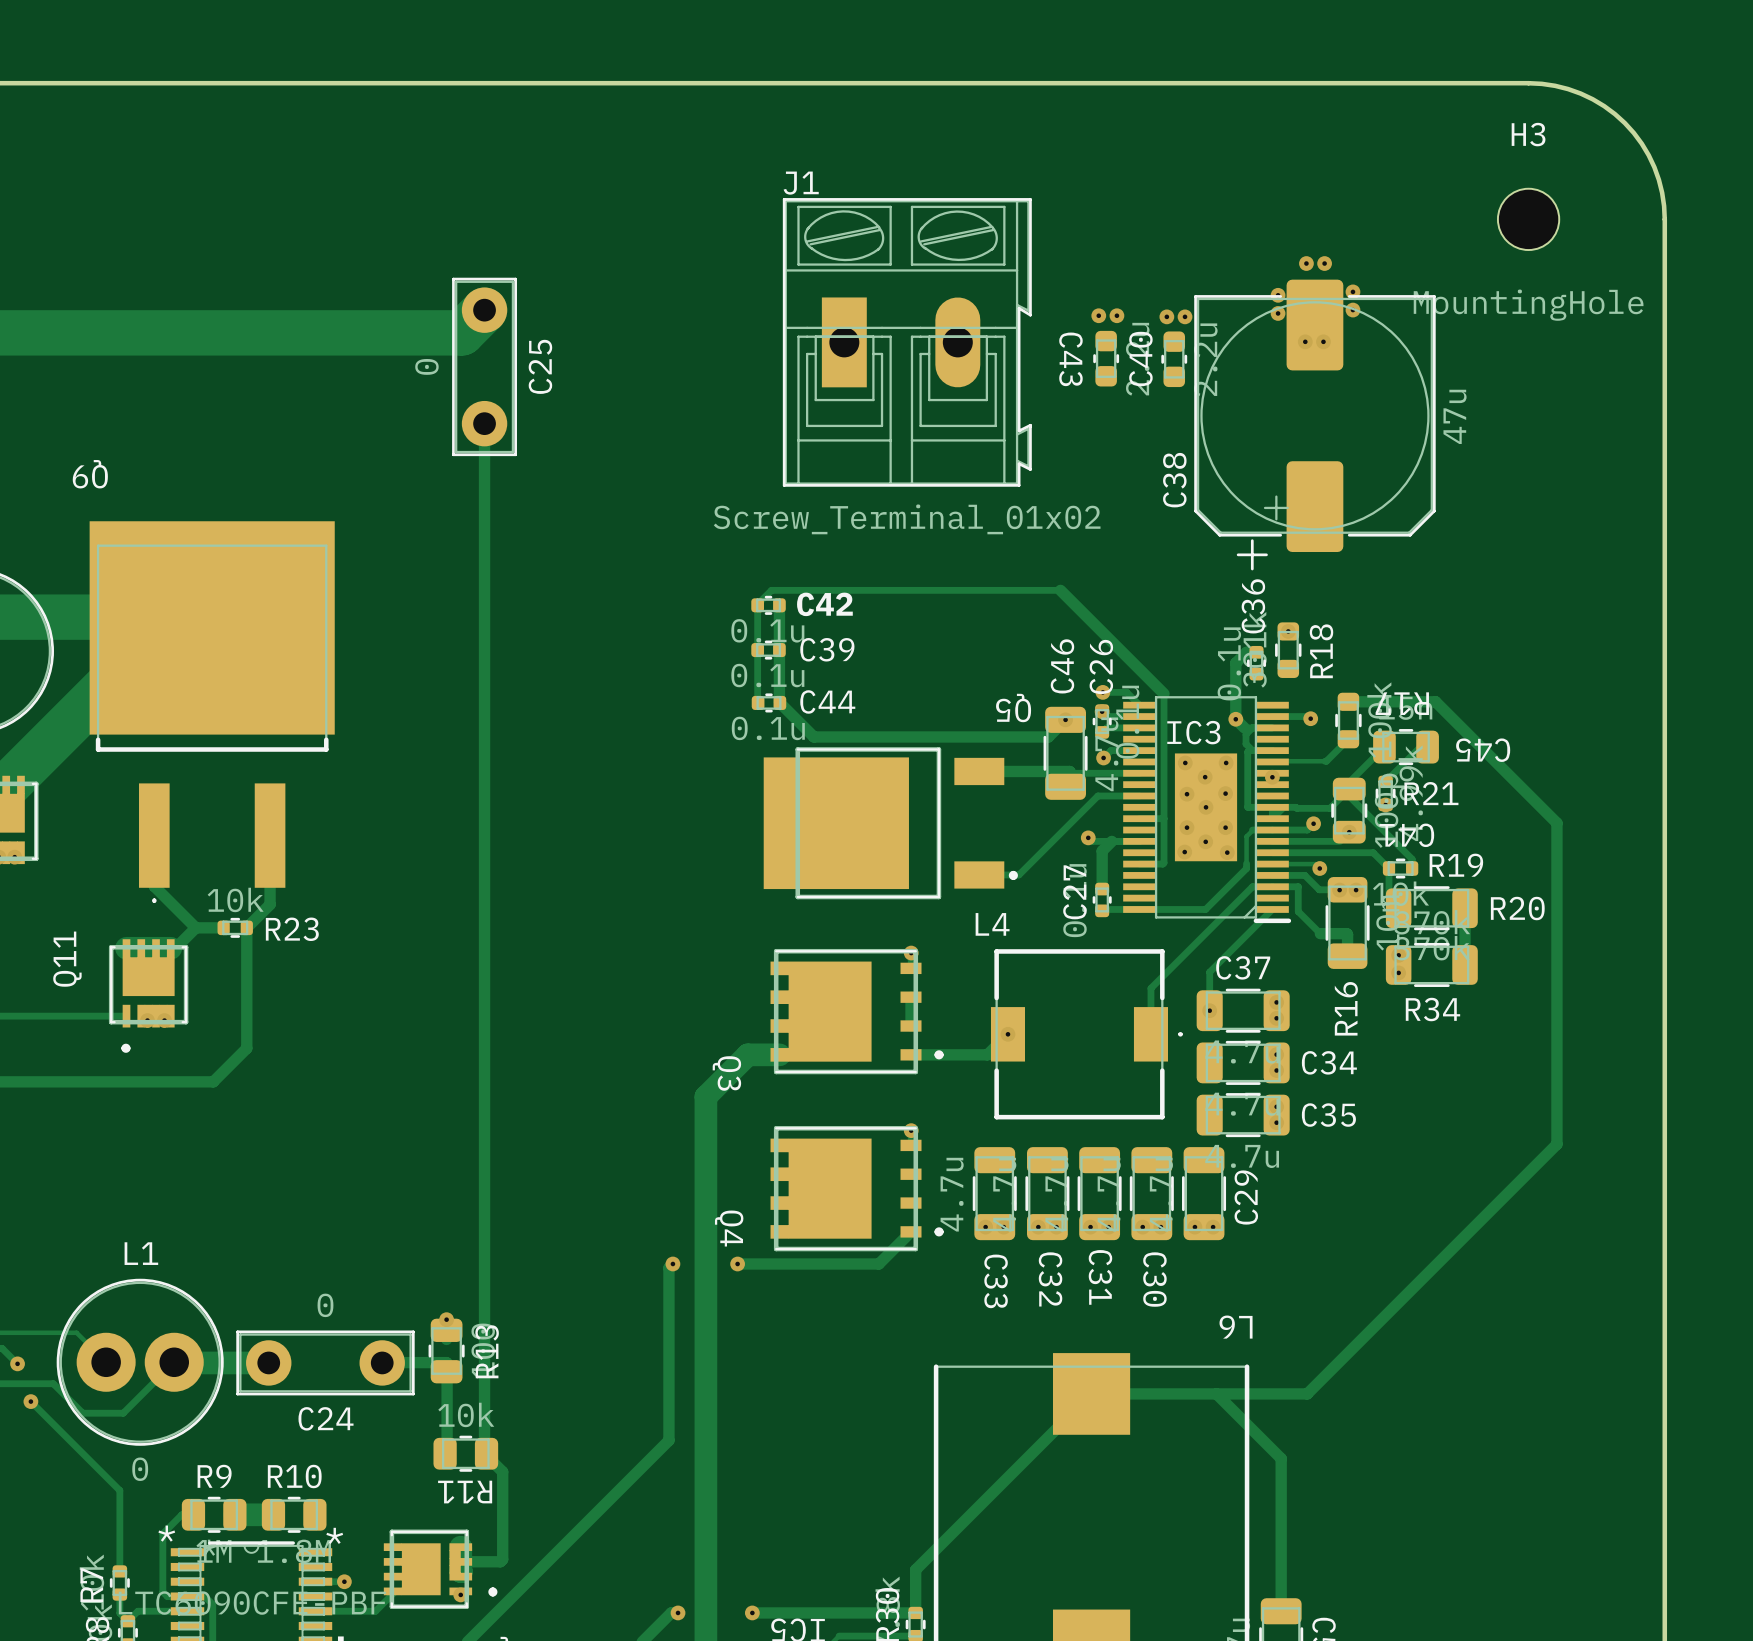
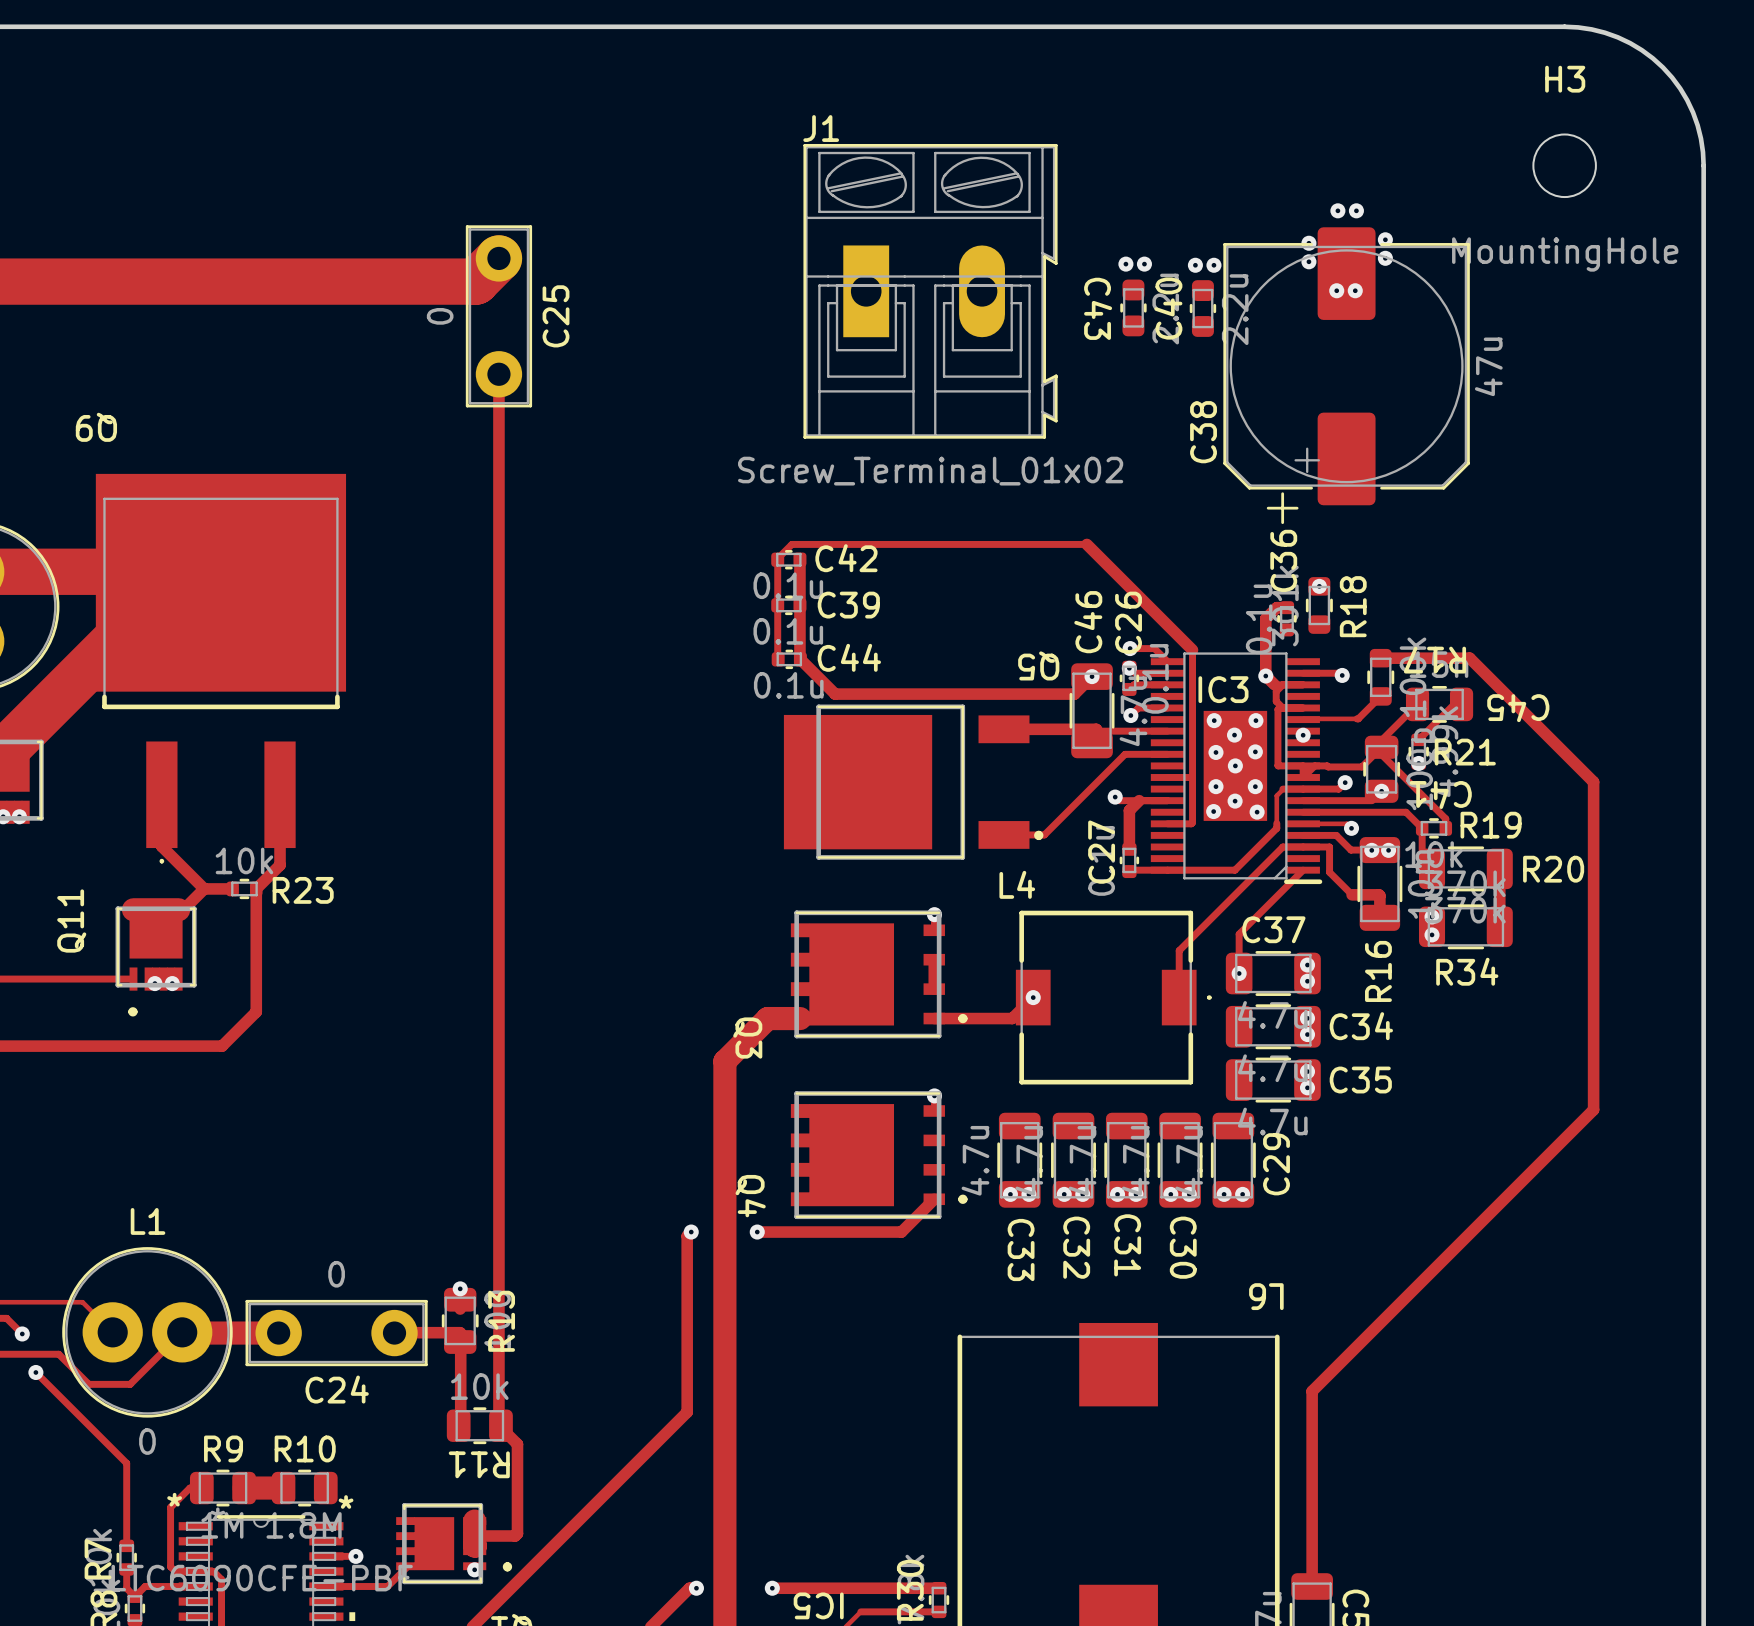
track: (1216, 1393) (1281, 1458) -> (1338, 1364) (1312, 1391) (1312, 1430)
track: (1307, 1393) (1091, 1393) (915, 1569) (915, 1612) -> none

